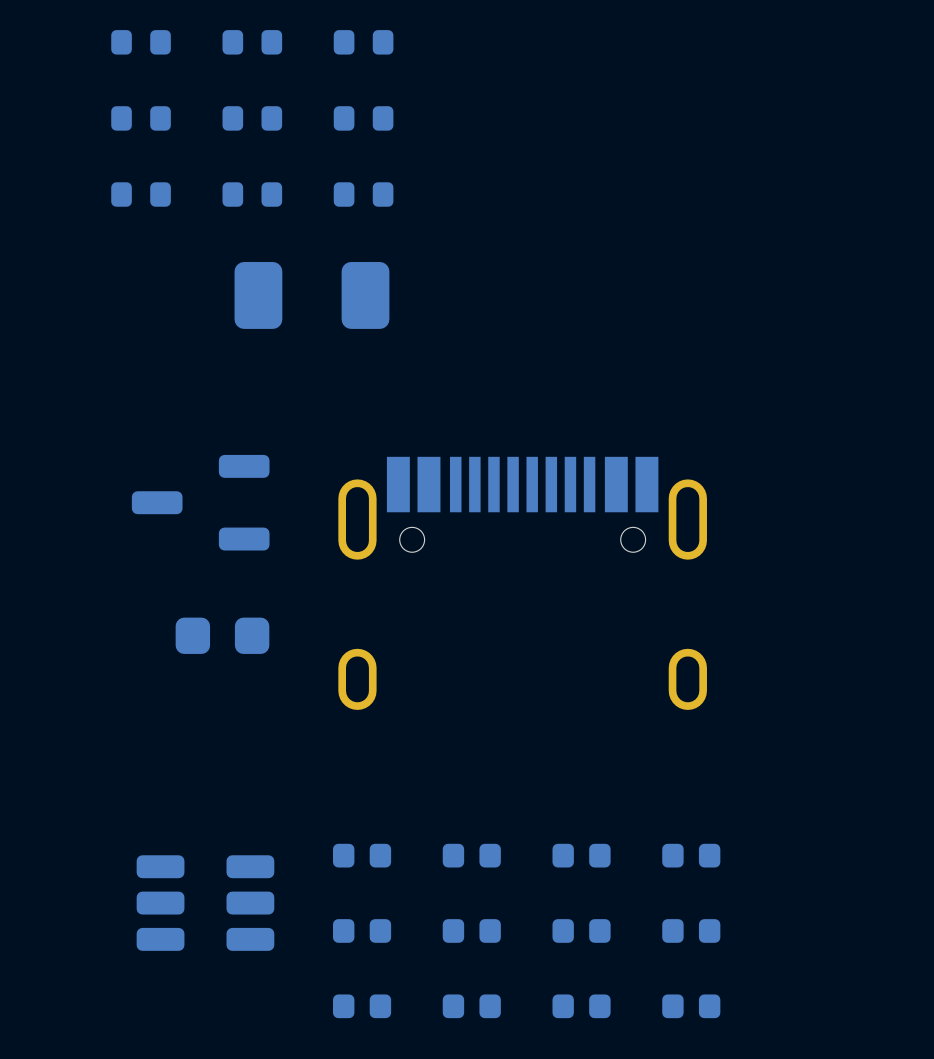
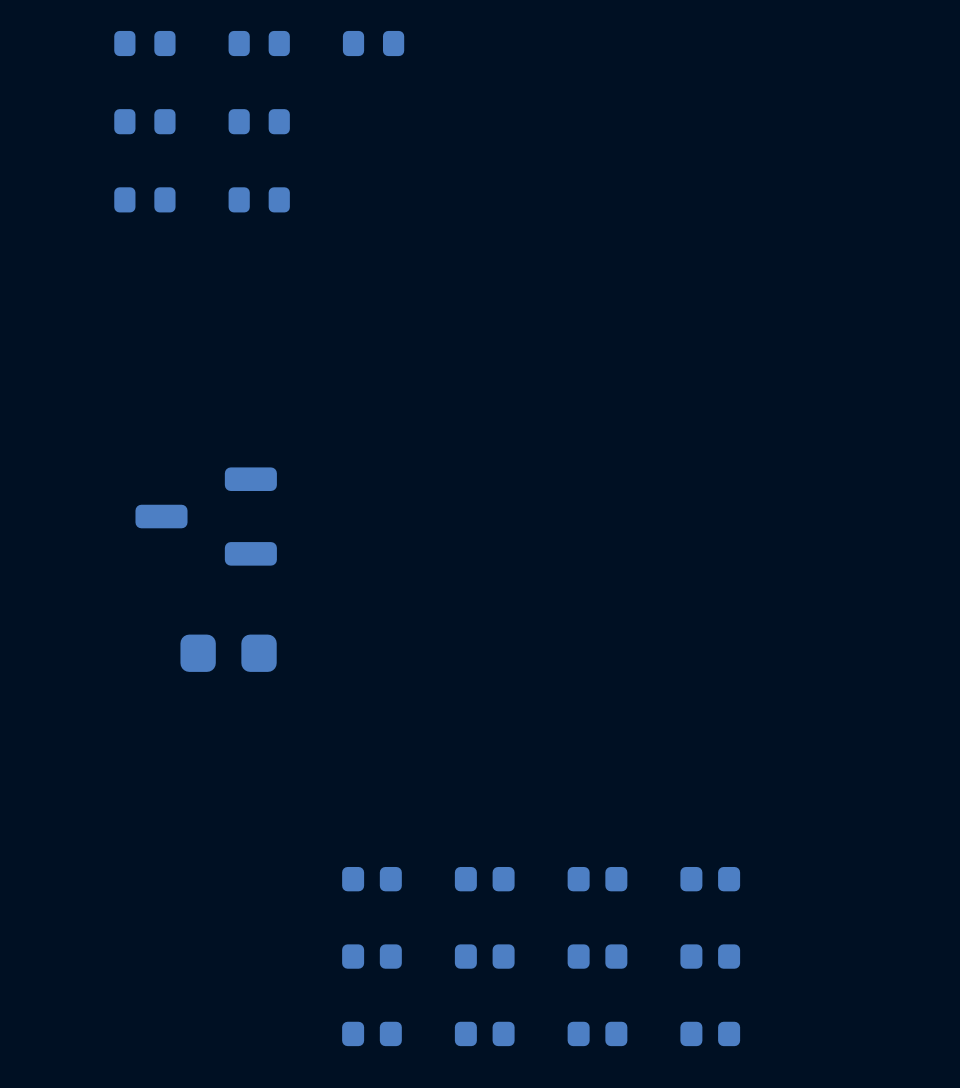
part: (363, 118) -> none
part: (363, 194) -> none
part: (311, 295) -> none
part: (522, 583) -> none
part: (205, 903) -> none

